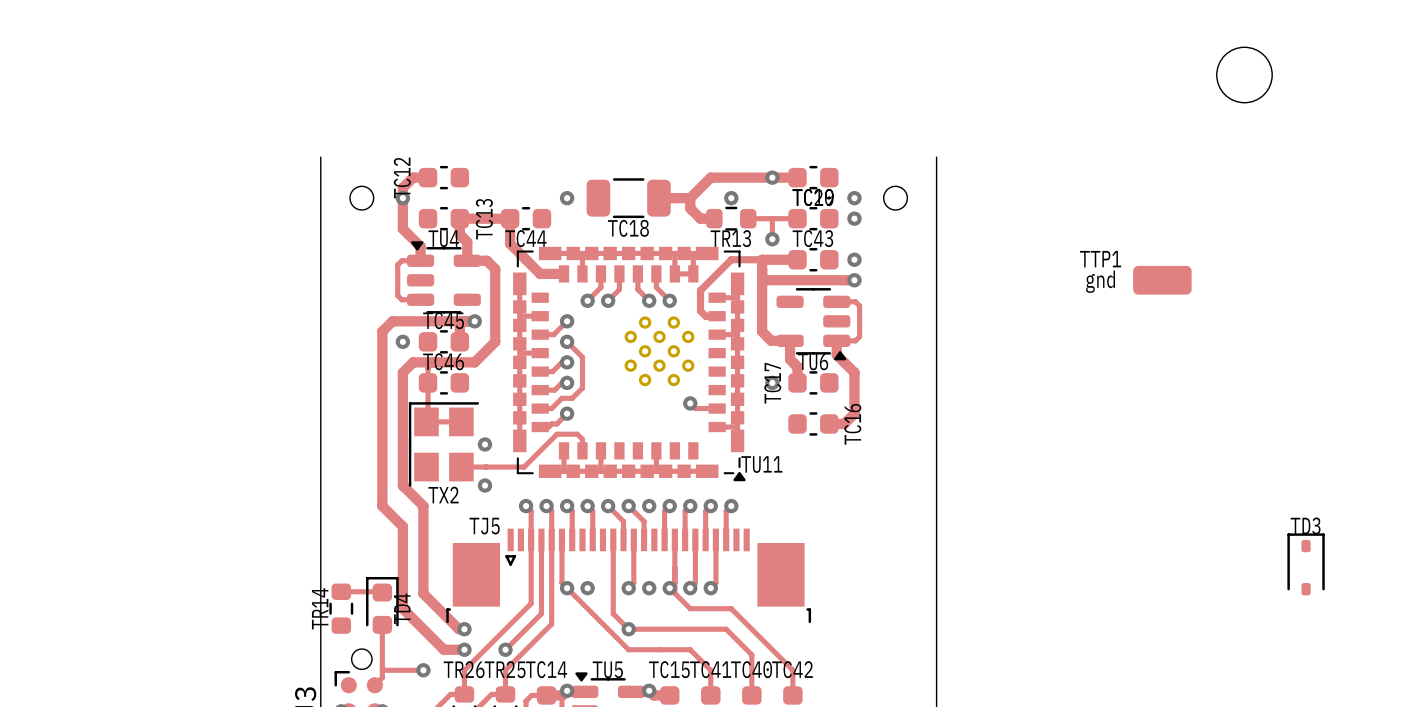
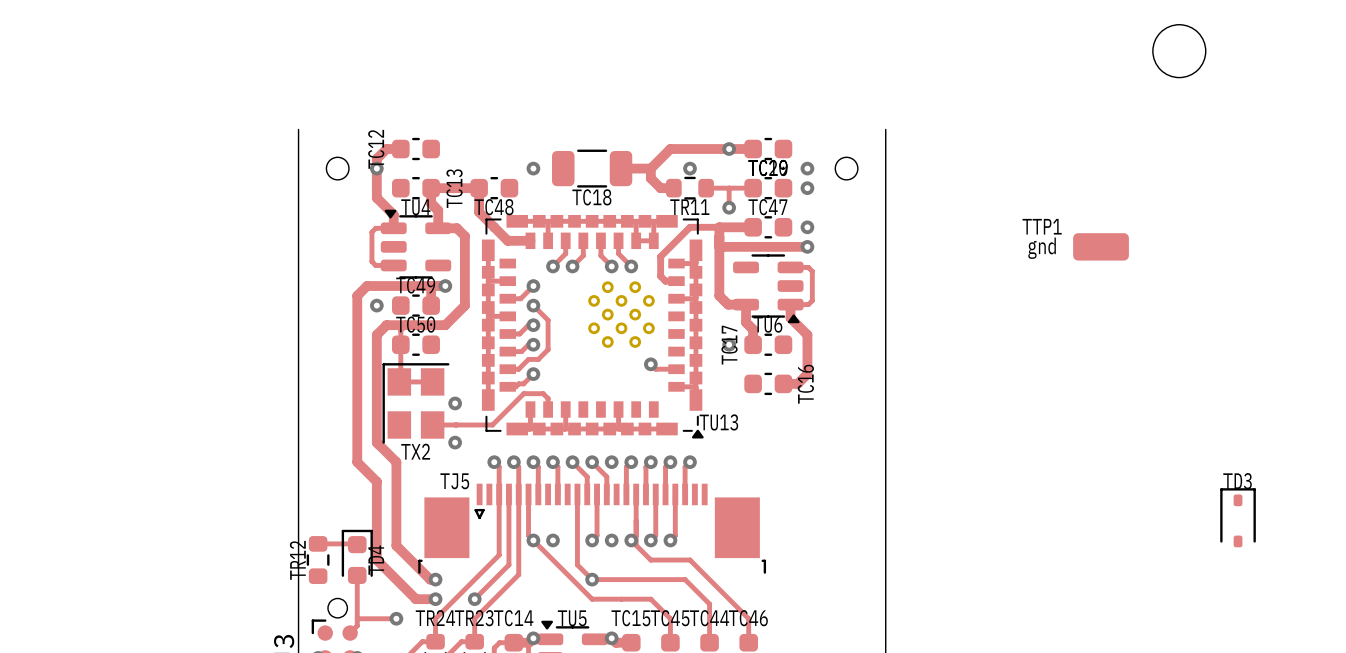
TC44 name: TC44 (525, 238) -> TC48 (494, 207)
TR13 name: TR13 (730, 238) -> TR11 (689, 207)
TC43 name: TC43 (812, 238) -> TC47 (767, 207)
TC45 name: TC45 (443, 320) -> TC49 (415, 285)
TC46 name: TC46 (443, 361) -> TC50 (415, 324)
TU11 name: TU11 (761, 464) -> TU13 (718, 422)
TR14 name: TR14 (320, 608) -> TR12 (297, 560)
TR26 name: TR26 (464, 669) -> TR24 (435, 618)
TR25 name: TR25 (505, 669) -> TR23 (474, 618)
TC41 name: TC41 (710, 669) -> TC45 (670, 618)
TC40 name: TC40 (751, 669) -> TC44 (709, 618)
TC42 name: TC42 (792, 669) -> TC46 (748, 618)

